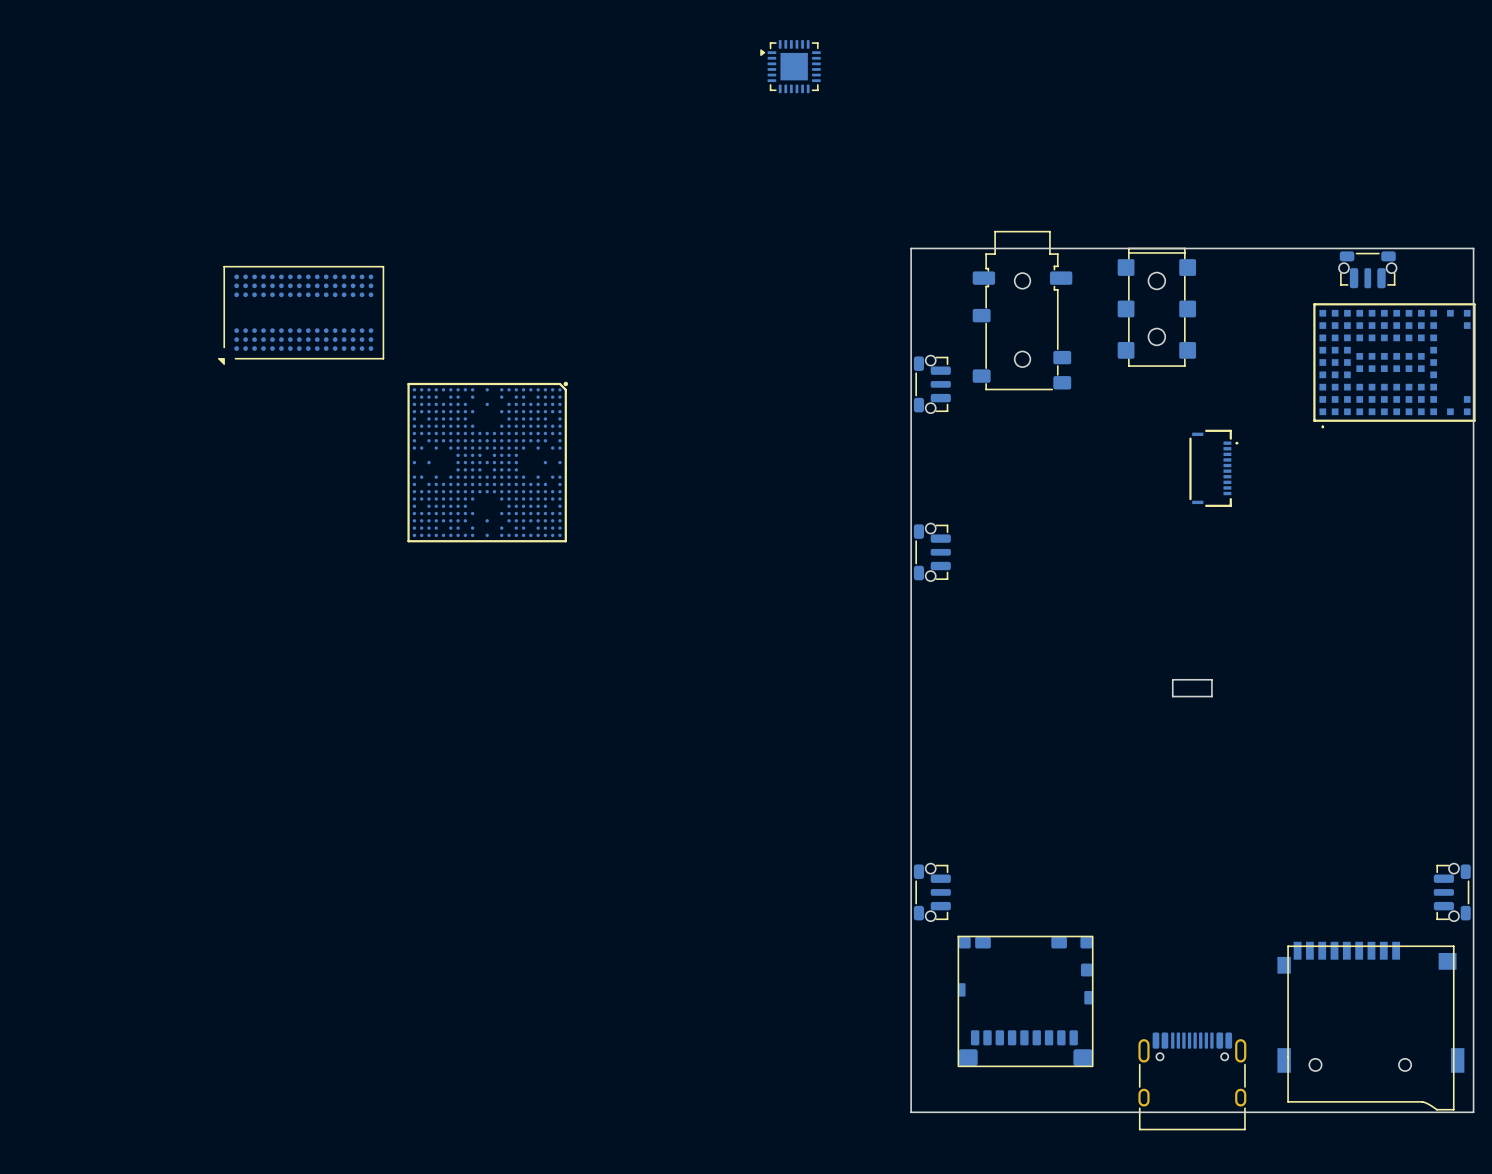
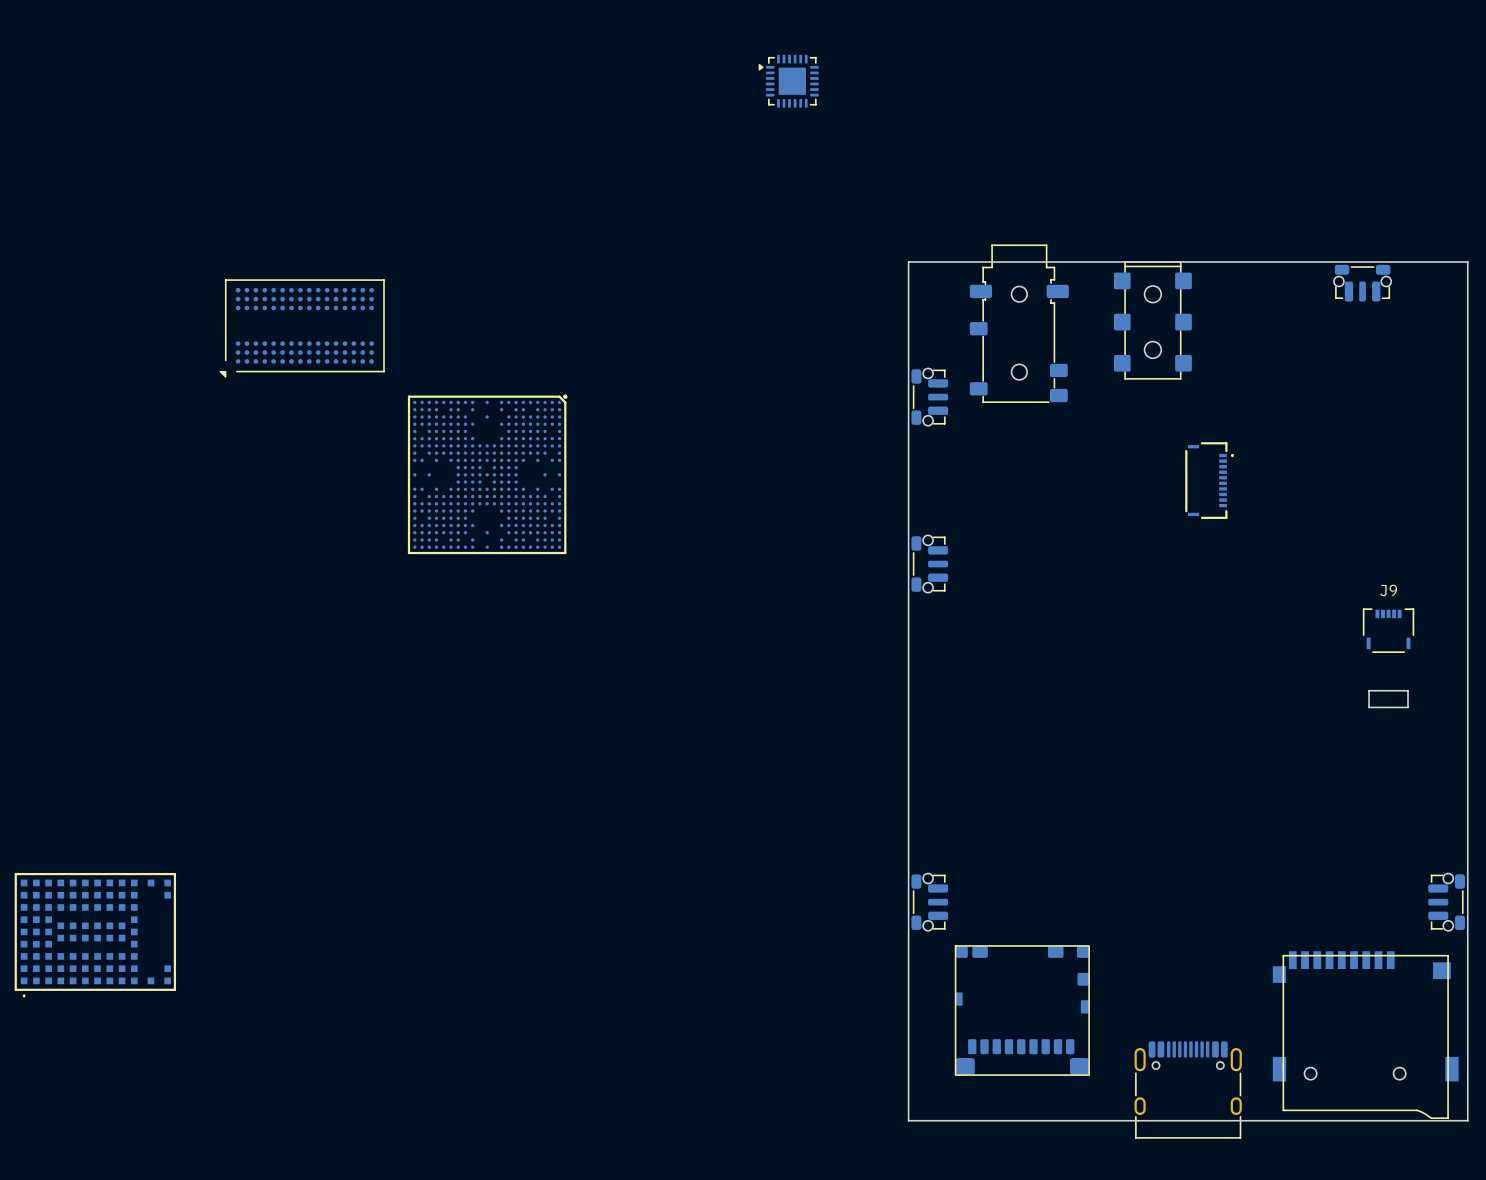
part: (1394, 365) -> none
J9: none -> (1388, 630)
board edge: (1211, 679) (1172, 679) (1172, 696) (1211, 696) (1211, 679) -> (1407, 690) (1369, 690) (1369, 707) (1407, 707) (1407, 690)
part: none -> (95, 935)

